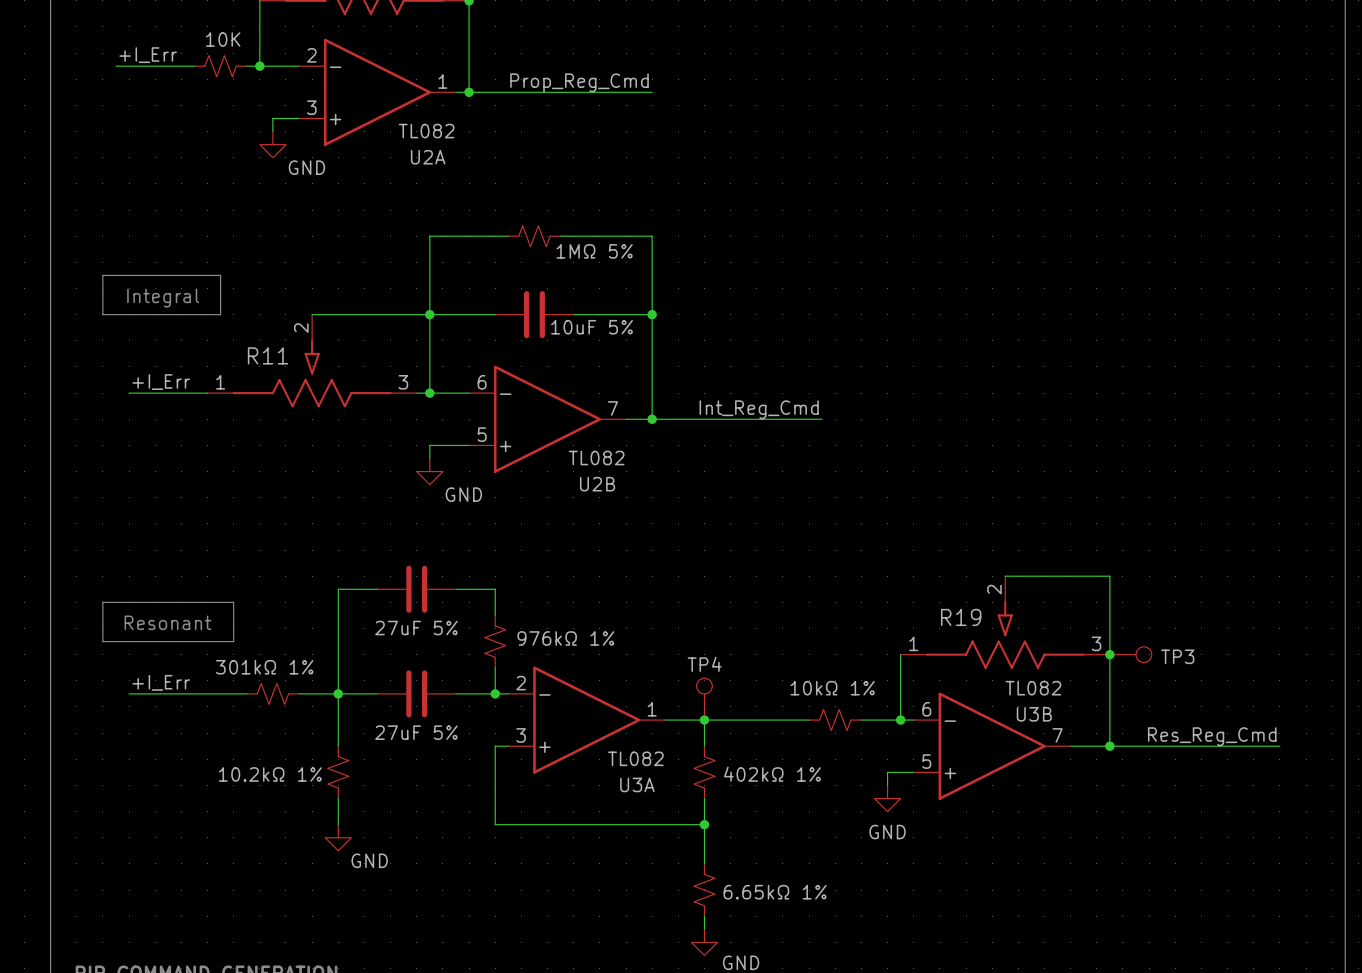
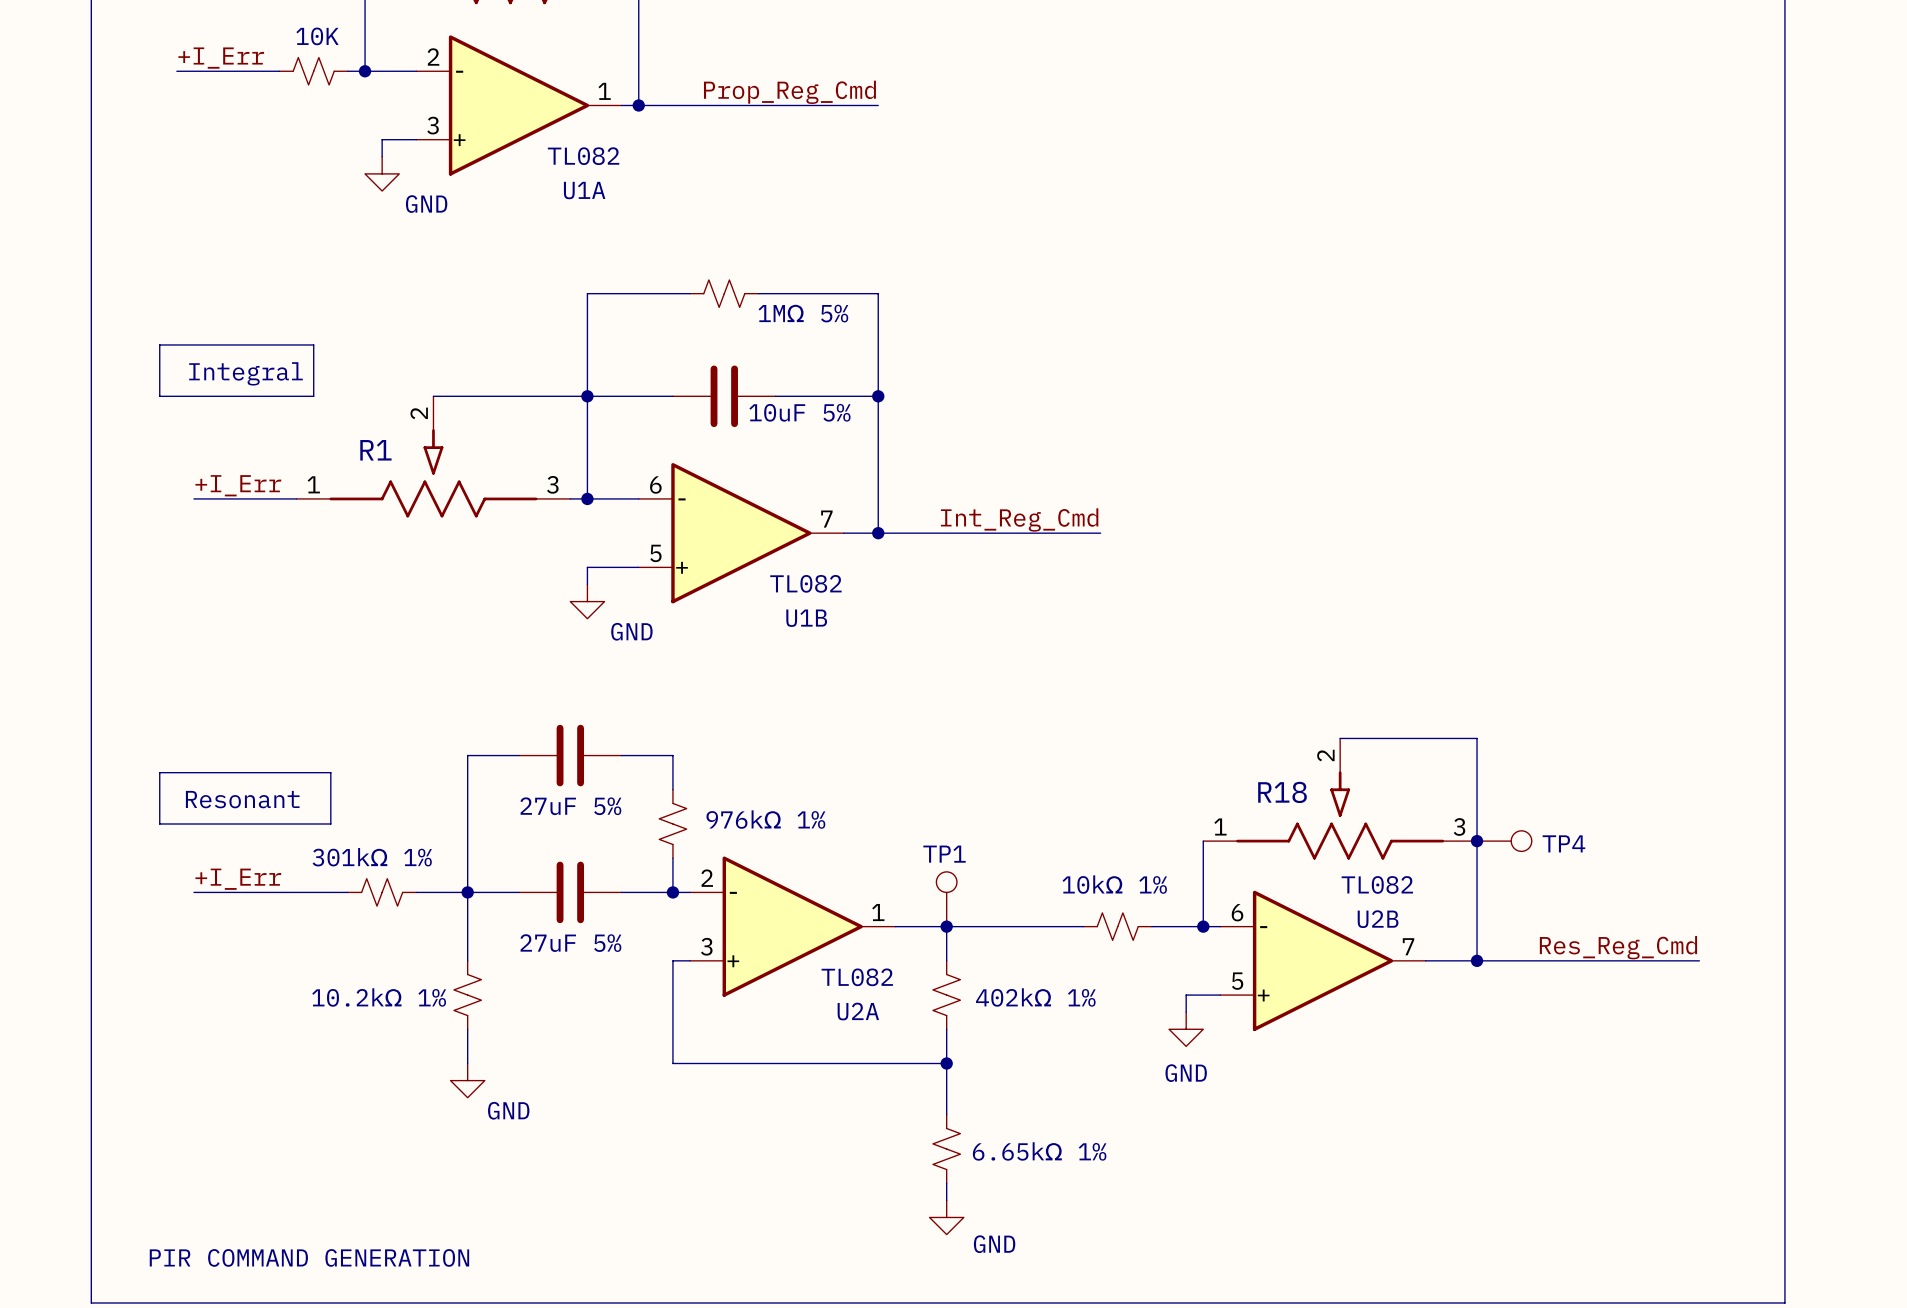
U2A name: U2A (428, 157) -> U1A (584, 190)
R11 name: R11 (268, 355) -> R1 (375, 450)
U2B name: U2B (597, 484) -> U1B (806, 618)
R19 name: R19 (961, 617) -> R18 (1282, 792)
TP3 name: TP3 (1177, 656) -> TP4 (1563, 843)
TP4 name: TP4 (704, 664) -> TP1 (944, 854)
U3B name: U3B (1034, 714) -> U2B (1378, 919)
U3A name: U3A (637, 784) -> U2A (858, 1011)

